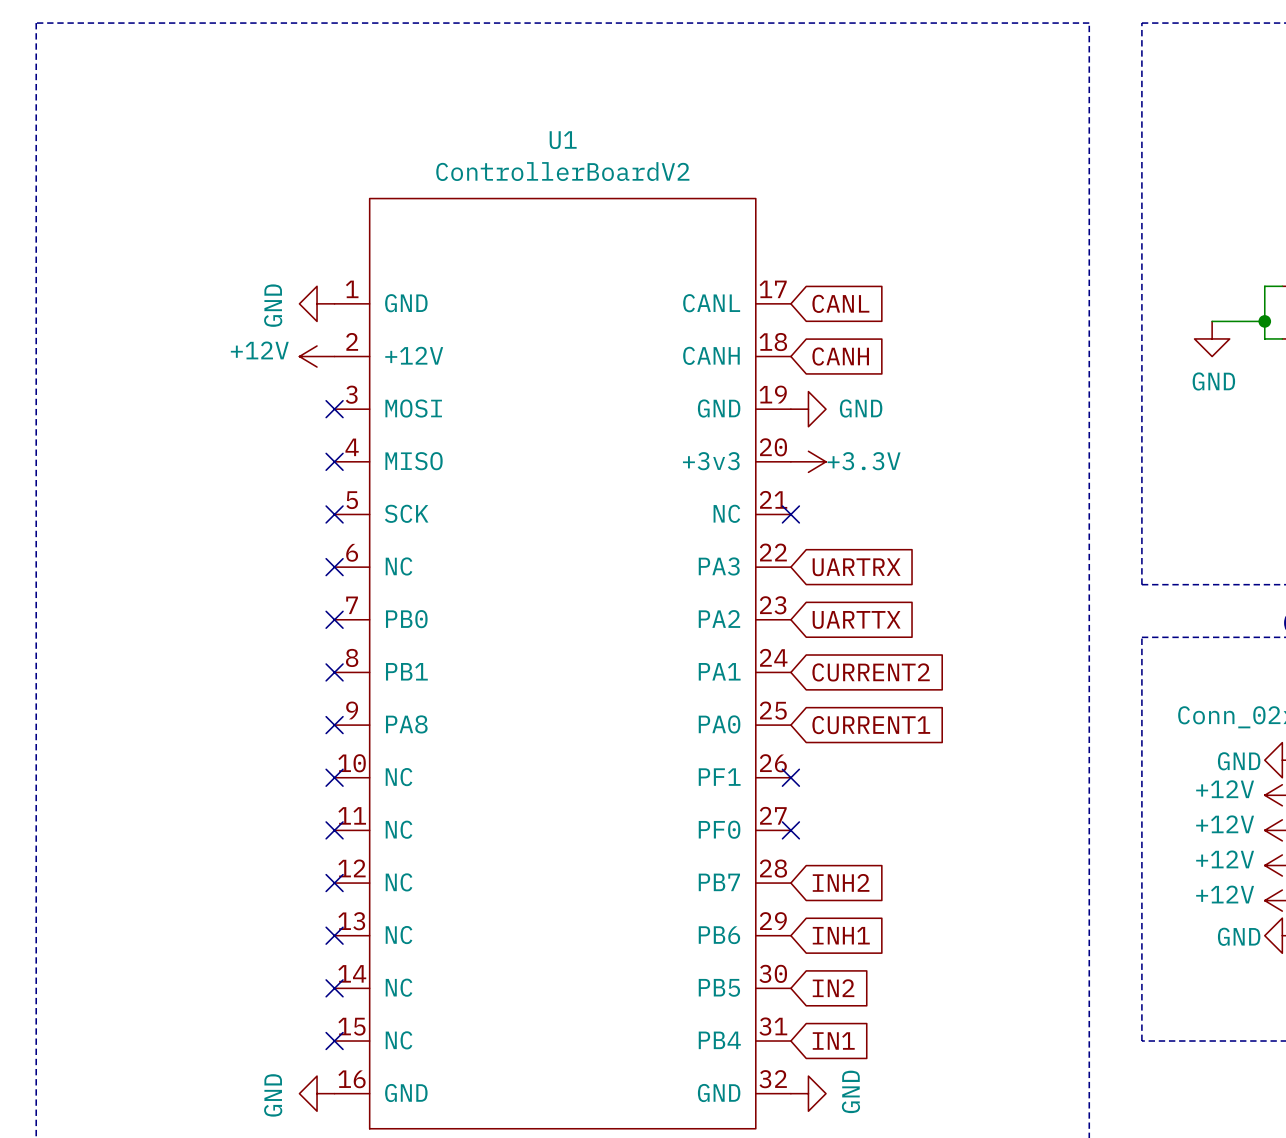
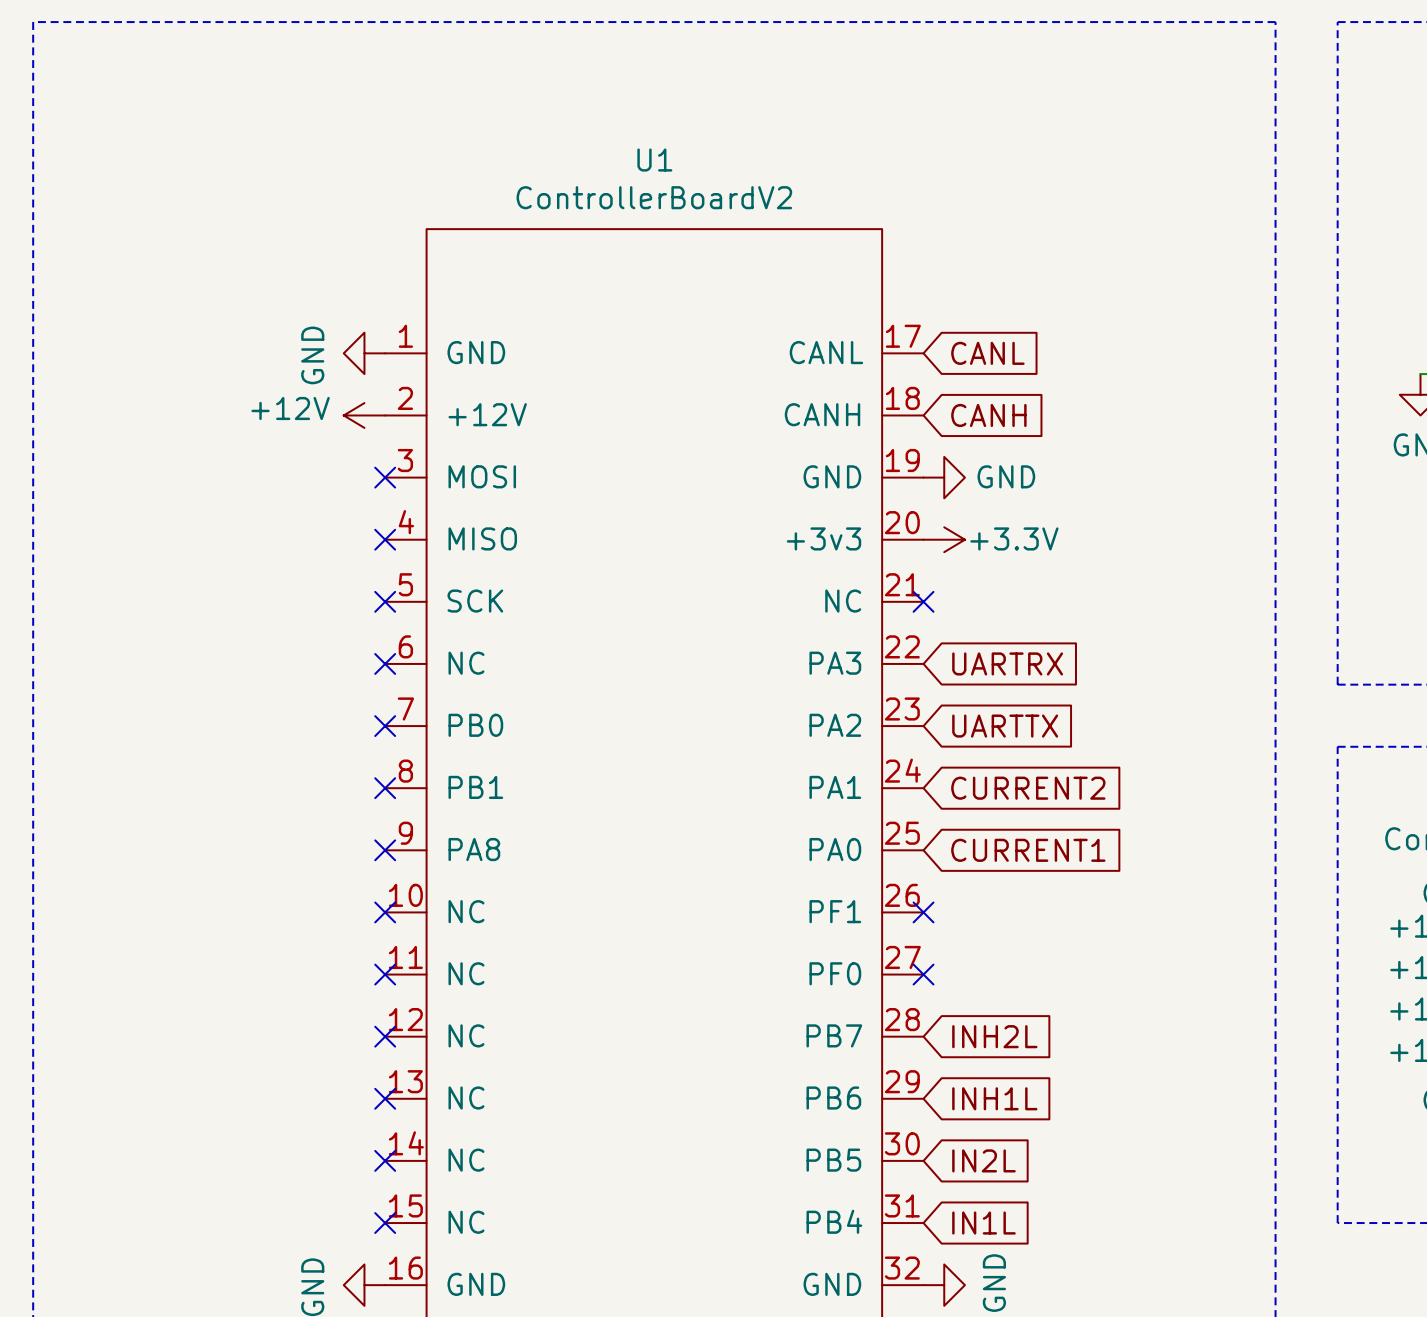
global label: INH2 (841, 882) -> INH2L (994, 1036)
global label: INH1 (841, 935) -> INH1L (994, 1098)
global label: IN2 (833, 988) -> IN2L (983, 1160)
global label: IN1 (833, 1041) -> IN1L (983, 1223)

